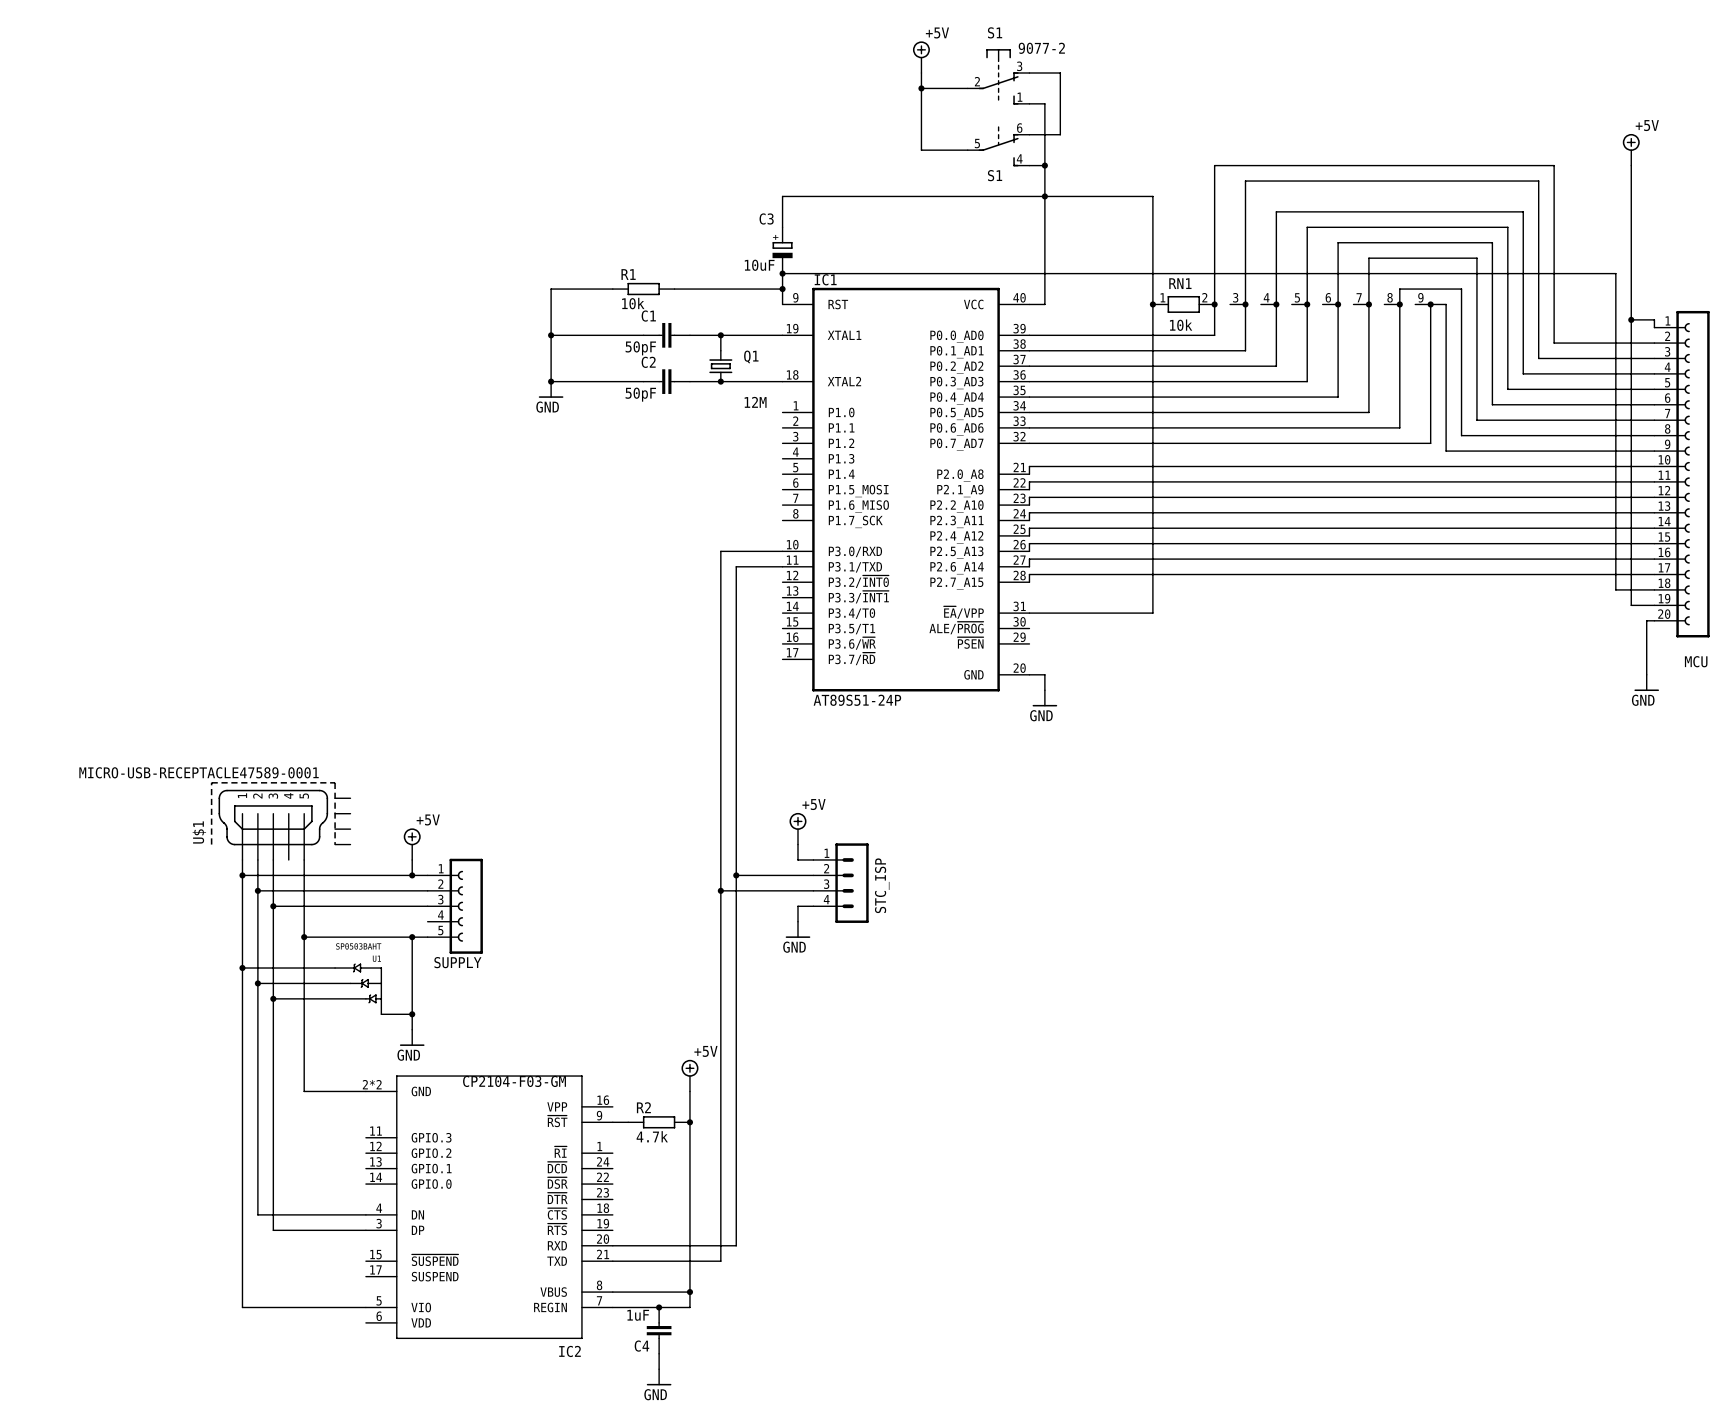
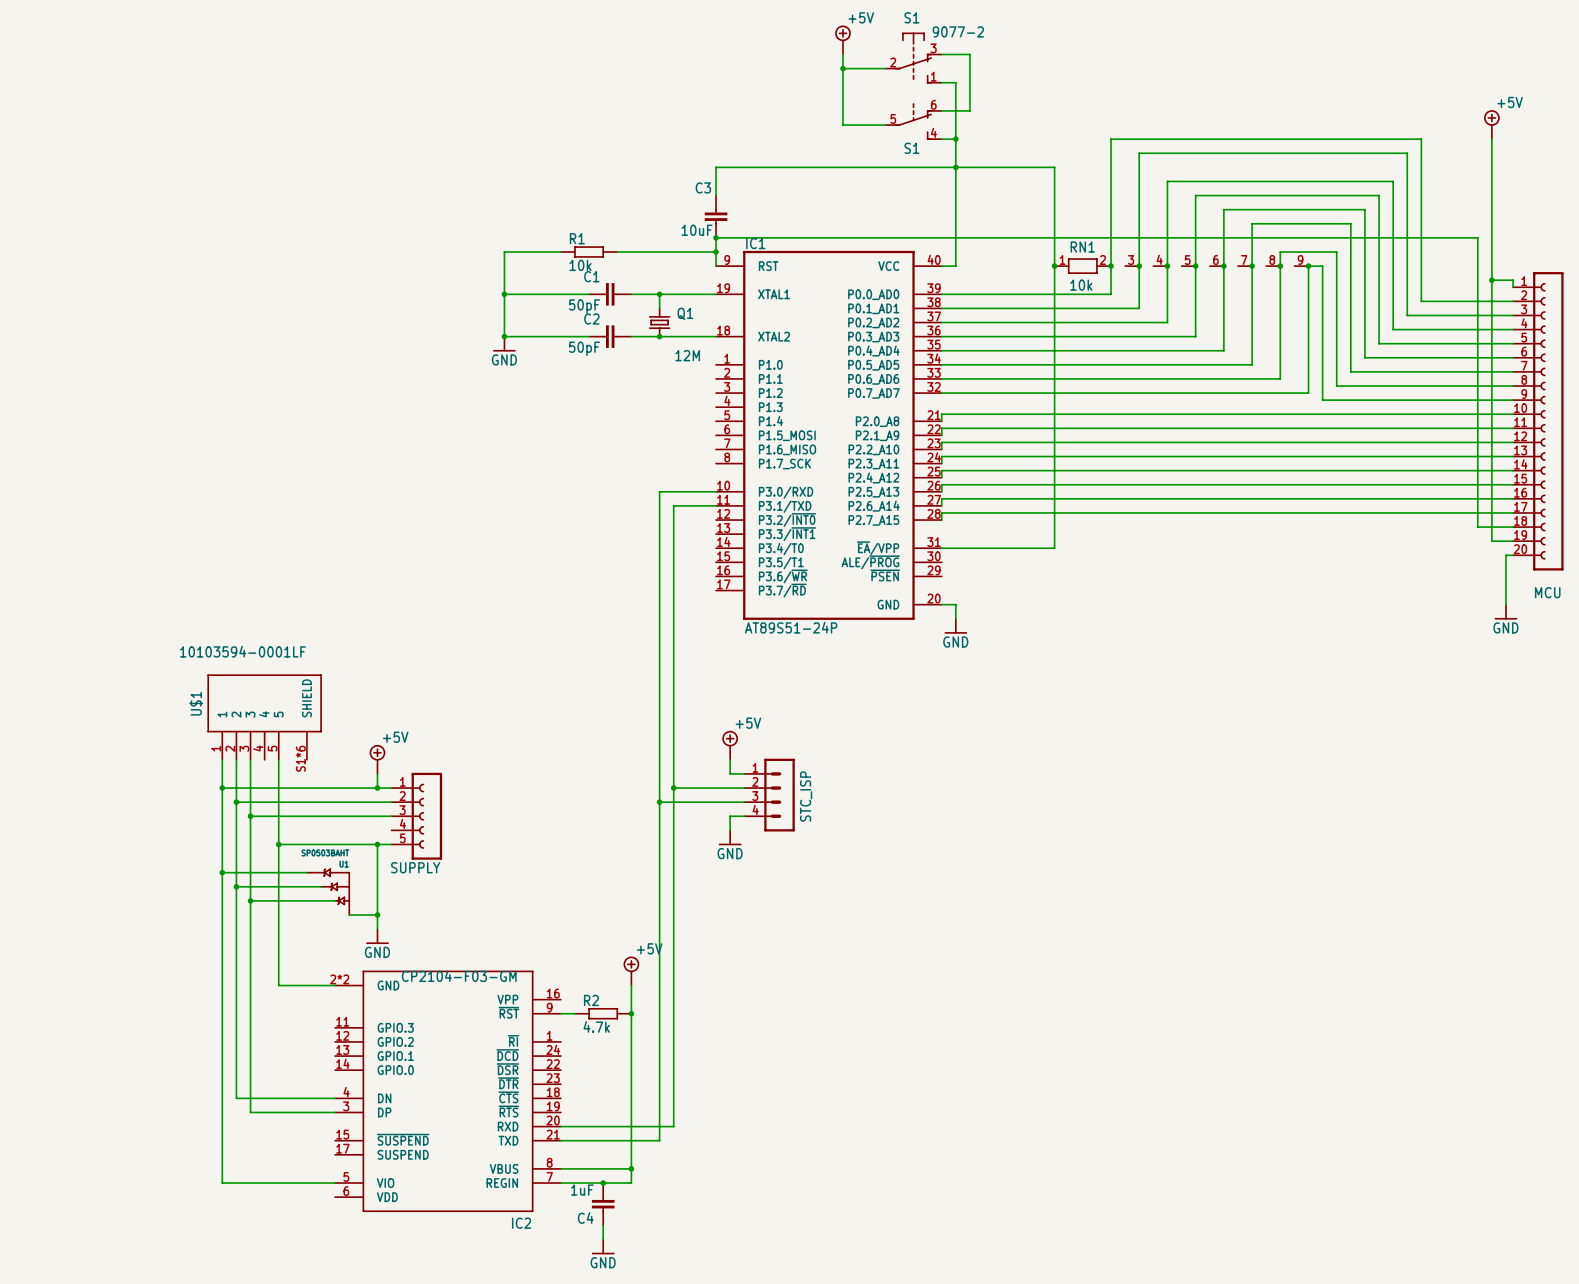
C3 symbol: [772, 227, 793, 274] -> [704, 195, 728, 238]
U$1 value: MICRO-USB-RECEPTACLE47589-0001 (199, 772) -> 10103594-0001LF (242, 651)
U$1 symbol: [210, 782, 351, 860] -> [207, 674, 322, 760]
U$1 name position: U$1 (199, 832) -> U$1 (196, 703)

